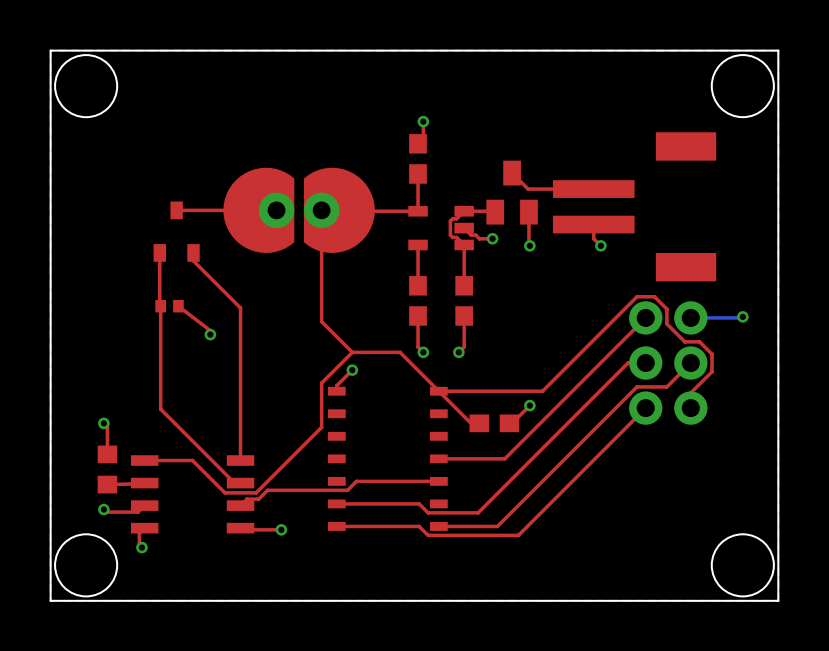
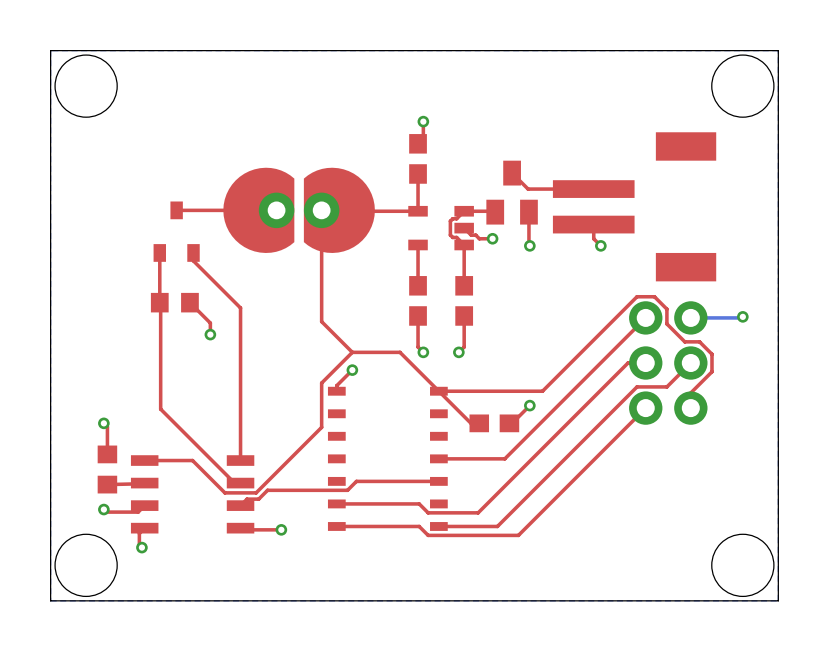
part footprint: [155, 300, 184, 313] -> [150, 292, 199, 313]
top track: (178, 306) (210, 330) -> (189, 302) (210, 323) (210, 330)

